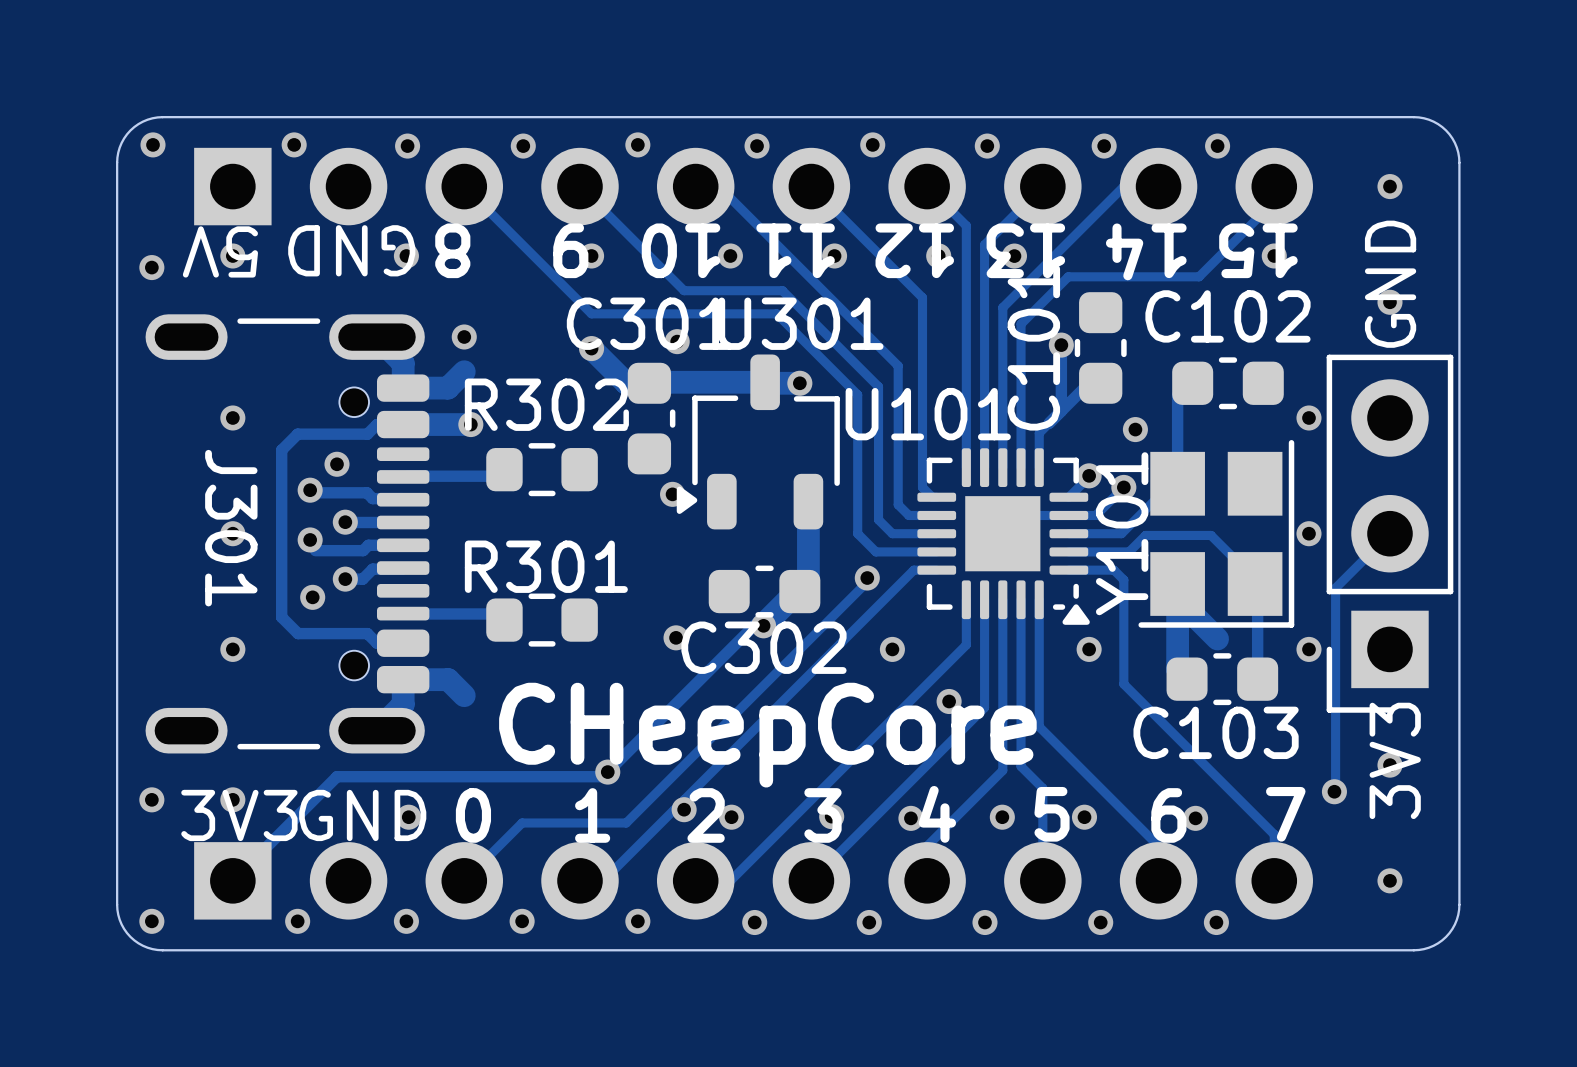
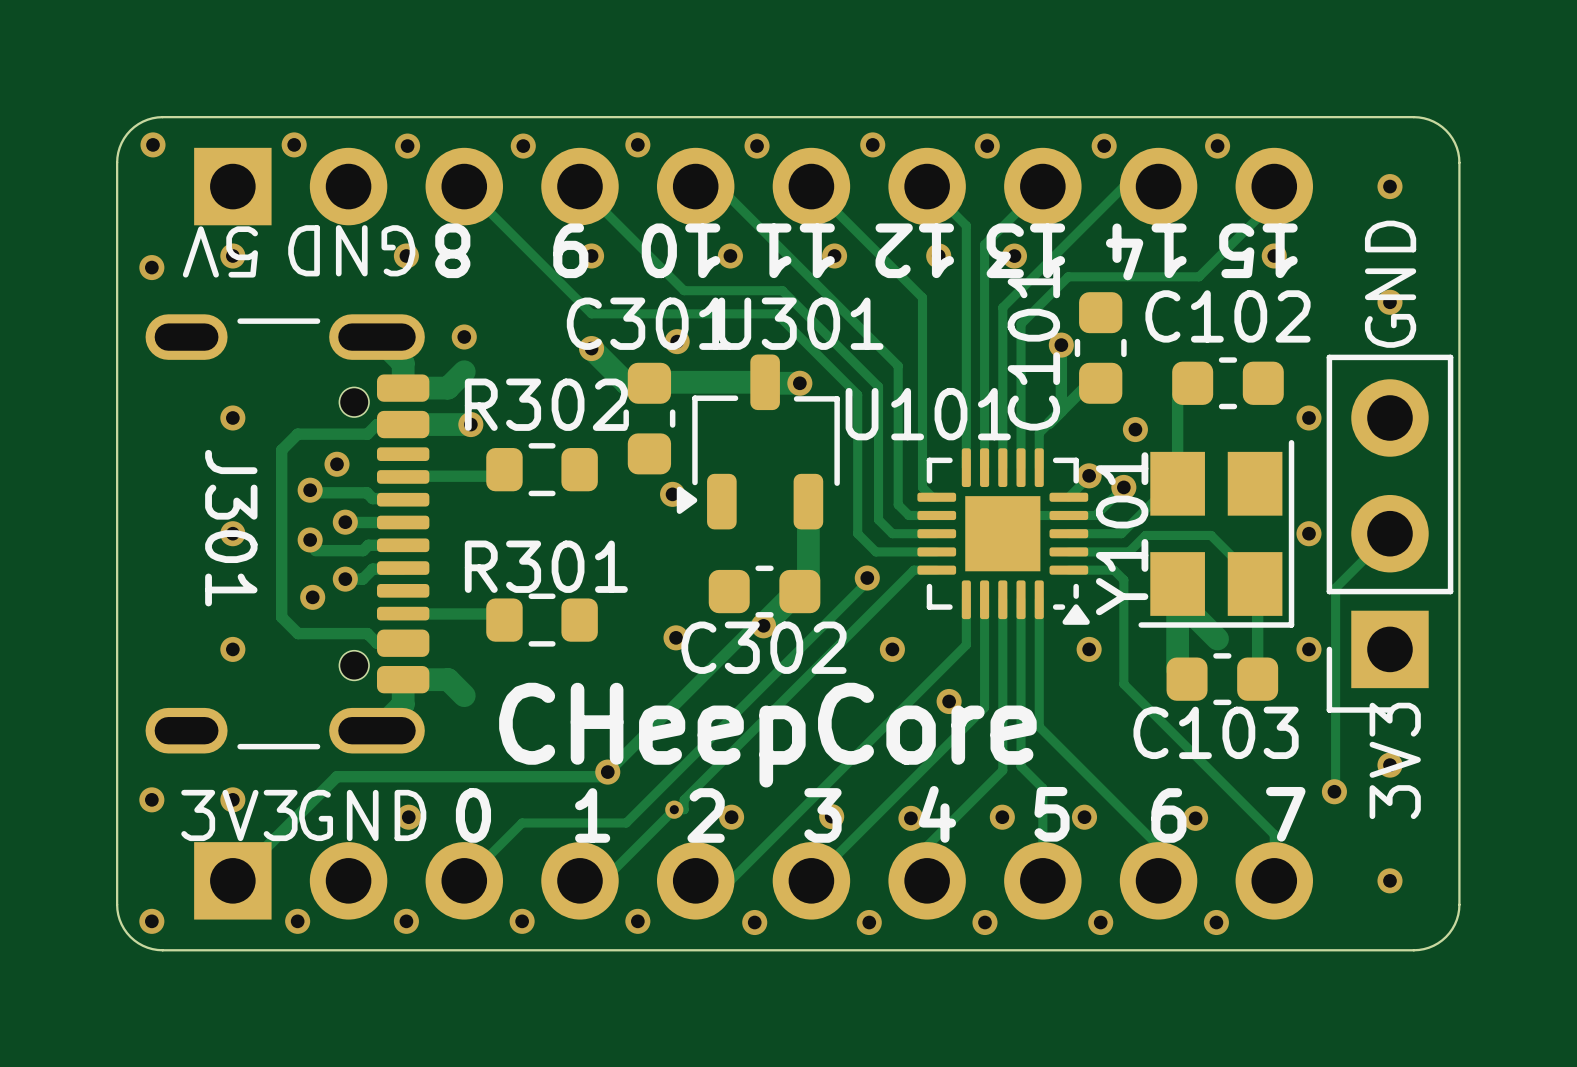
via size: [671, 797, 697, 823] -> [665, 800, 684, 819]

